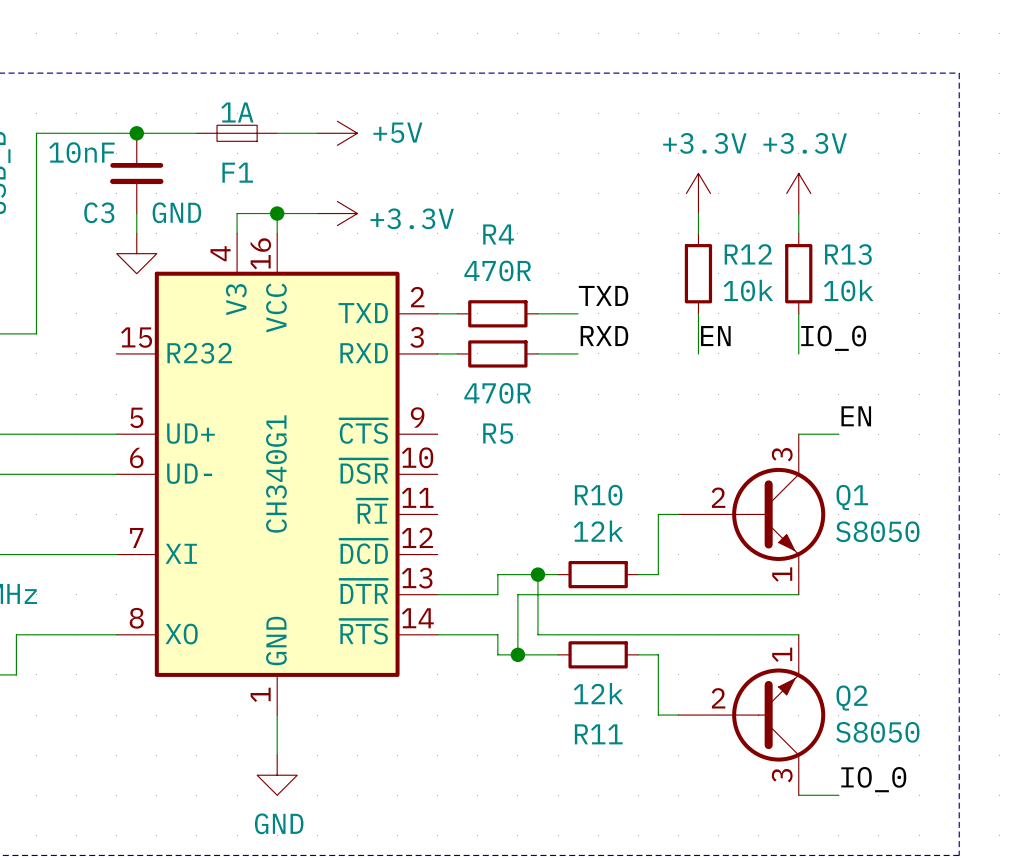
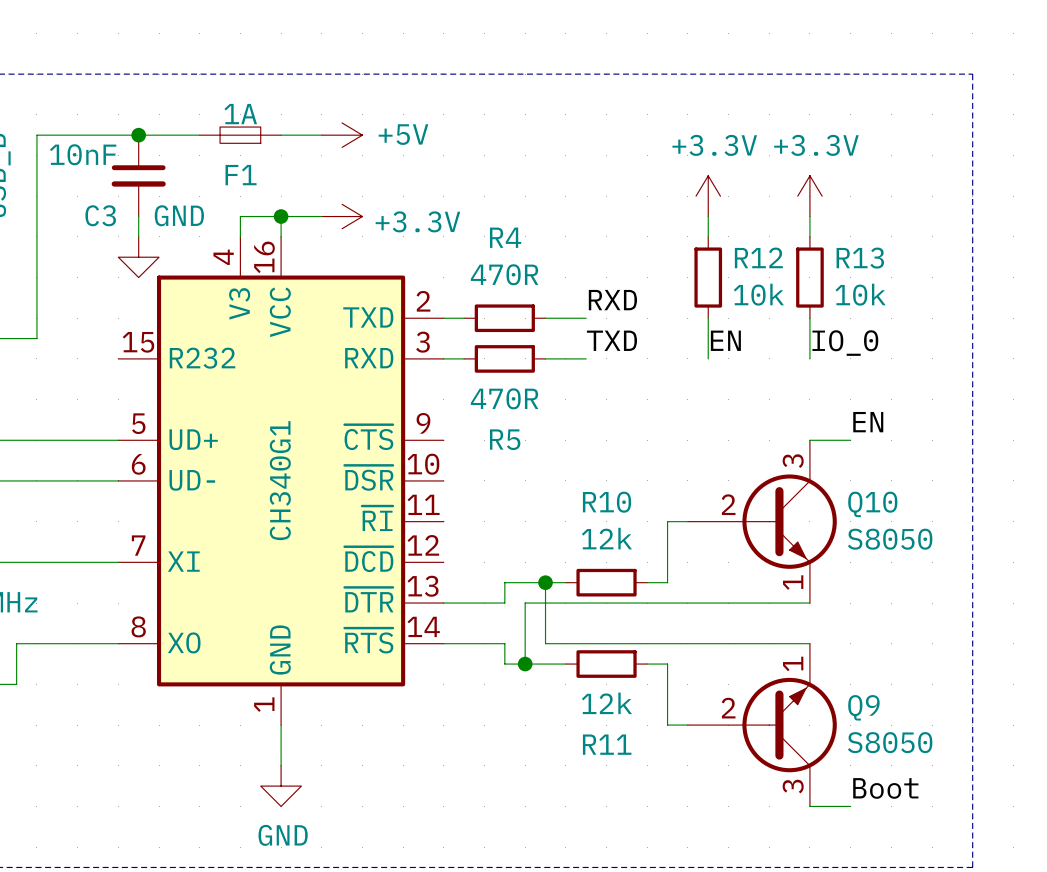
label: TXD (603, 295) -> RXD (612, 300)
label: RXD (604, 336) -> TXD (611, 340)
Q1 name: Q1 (852, 497) -> Q10 (872, 504)
Q2 name: Q2 (852, 698) -> Q9 (863, 707)
label: IO_0 (873, 779) -> Boot (885, 788)

